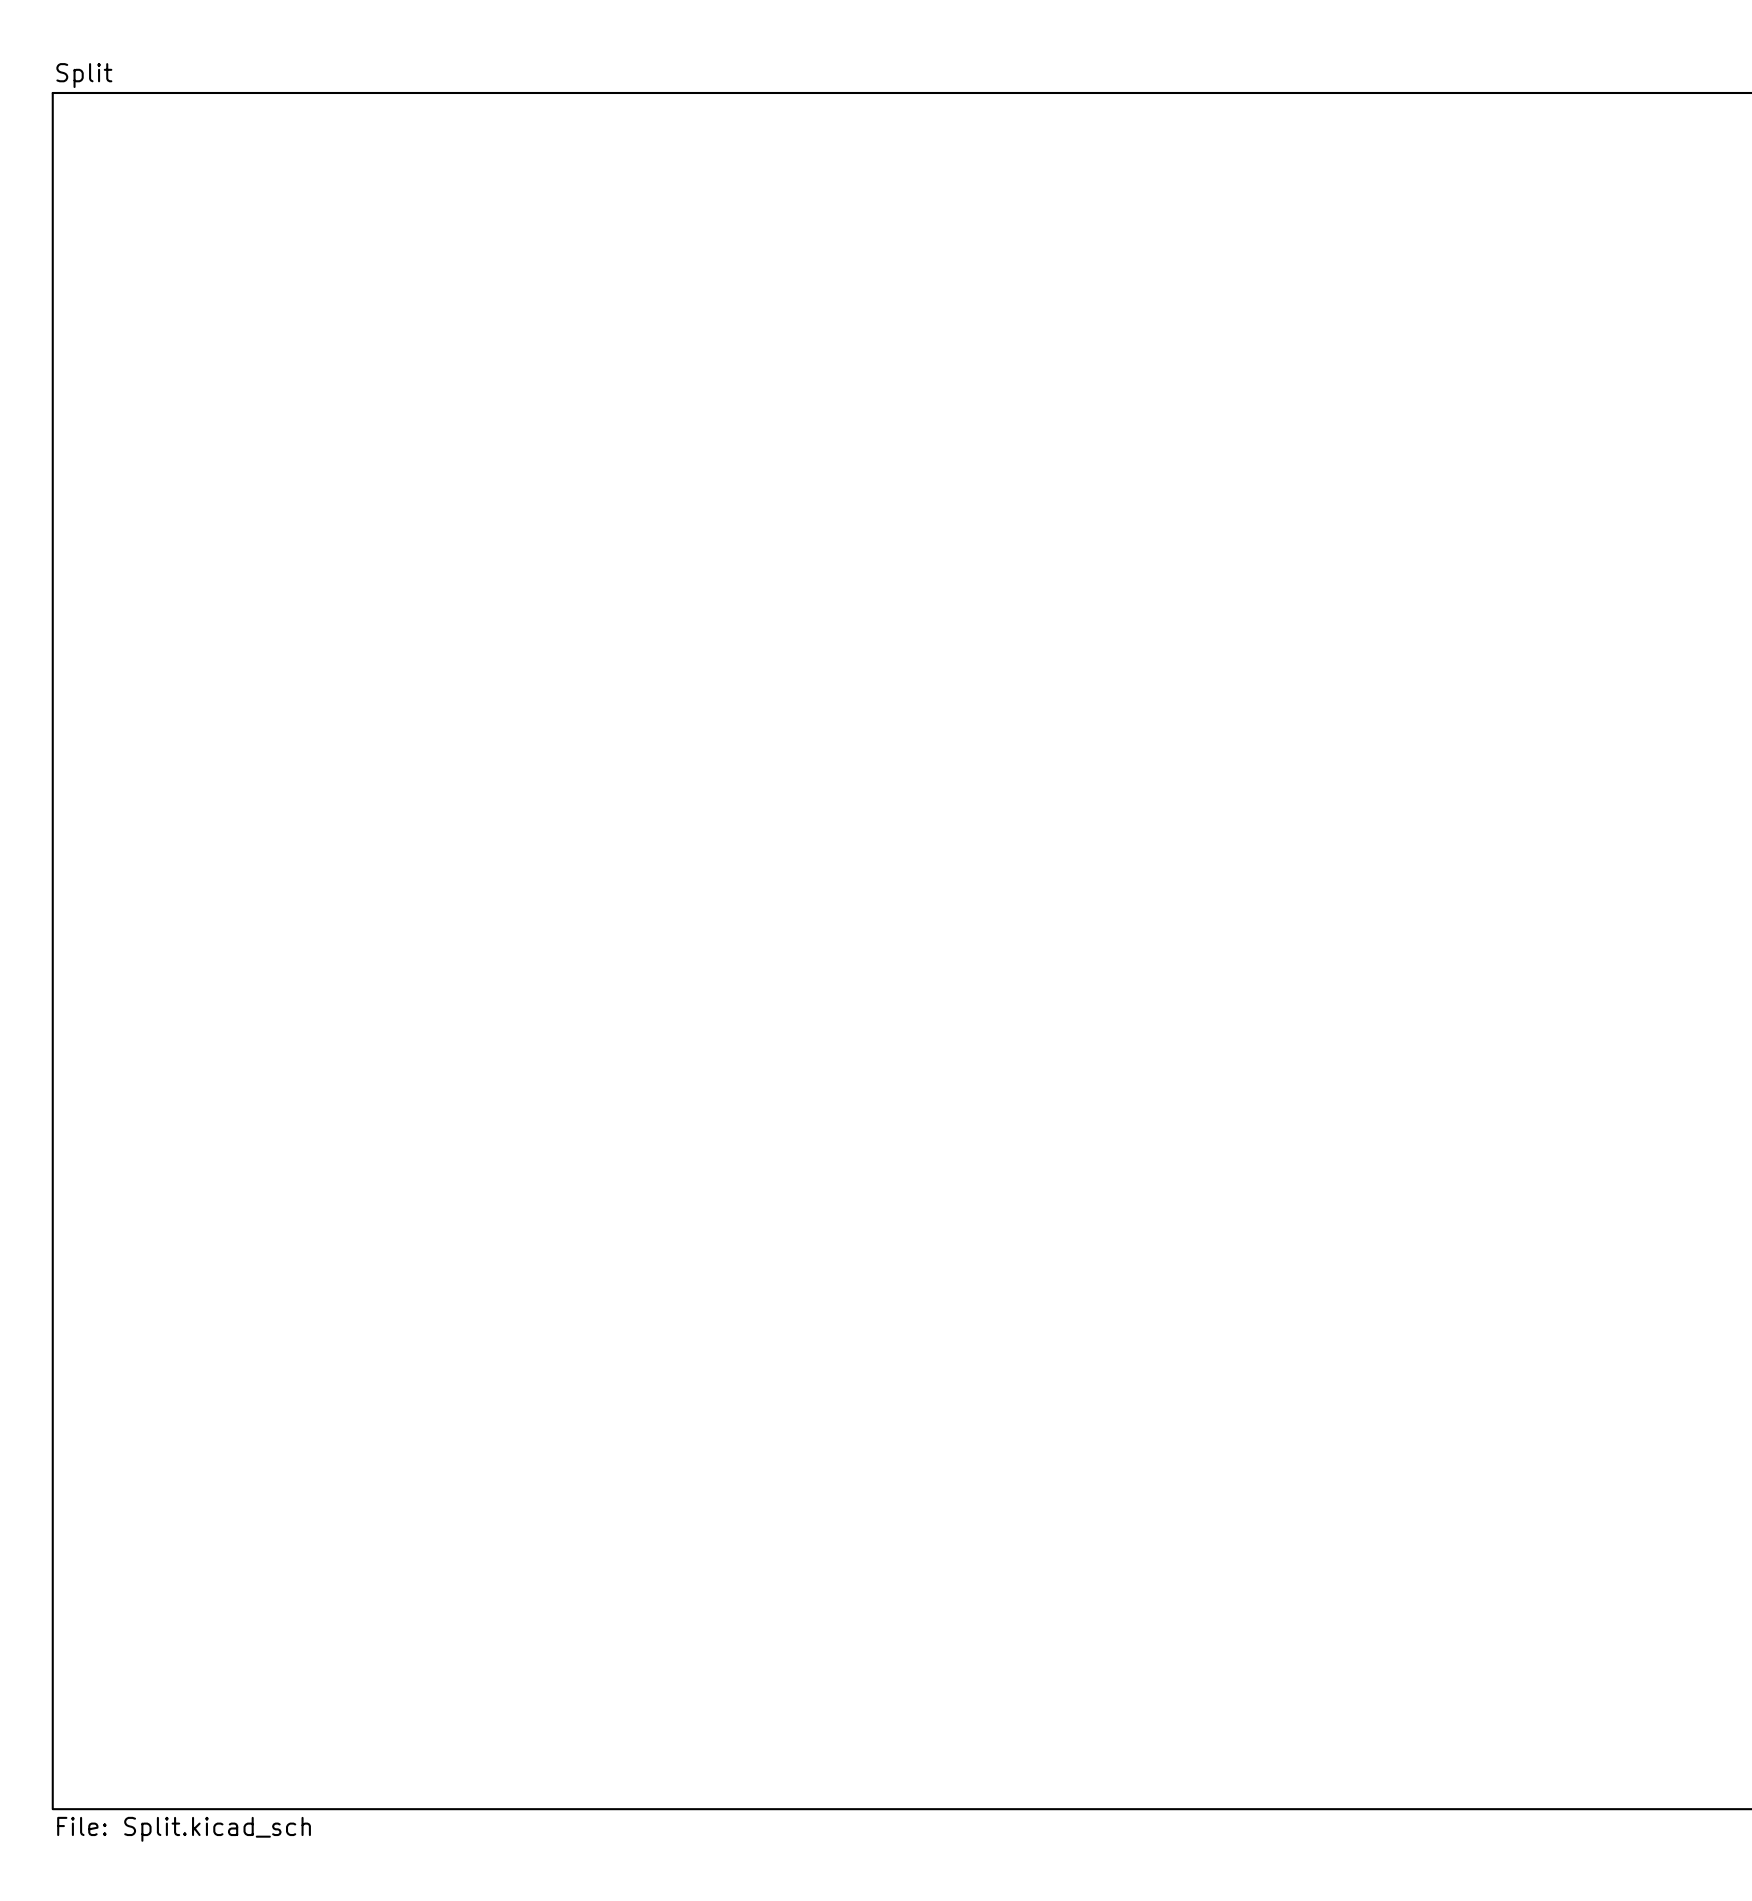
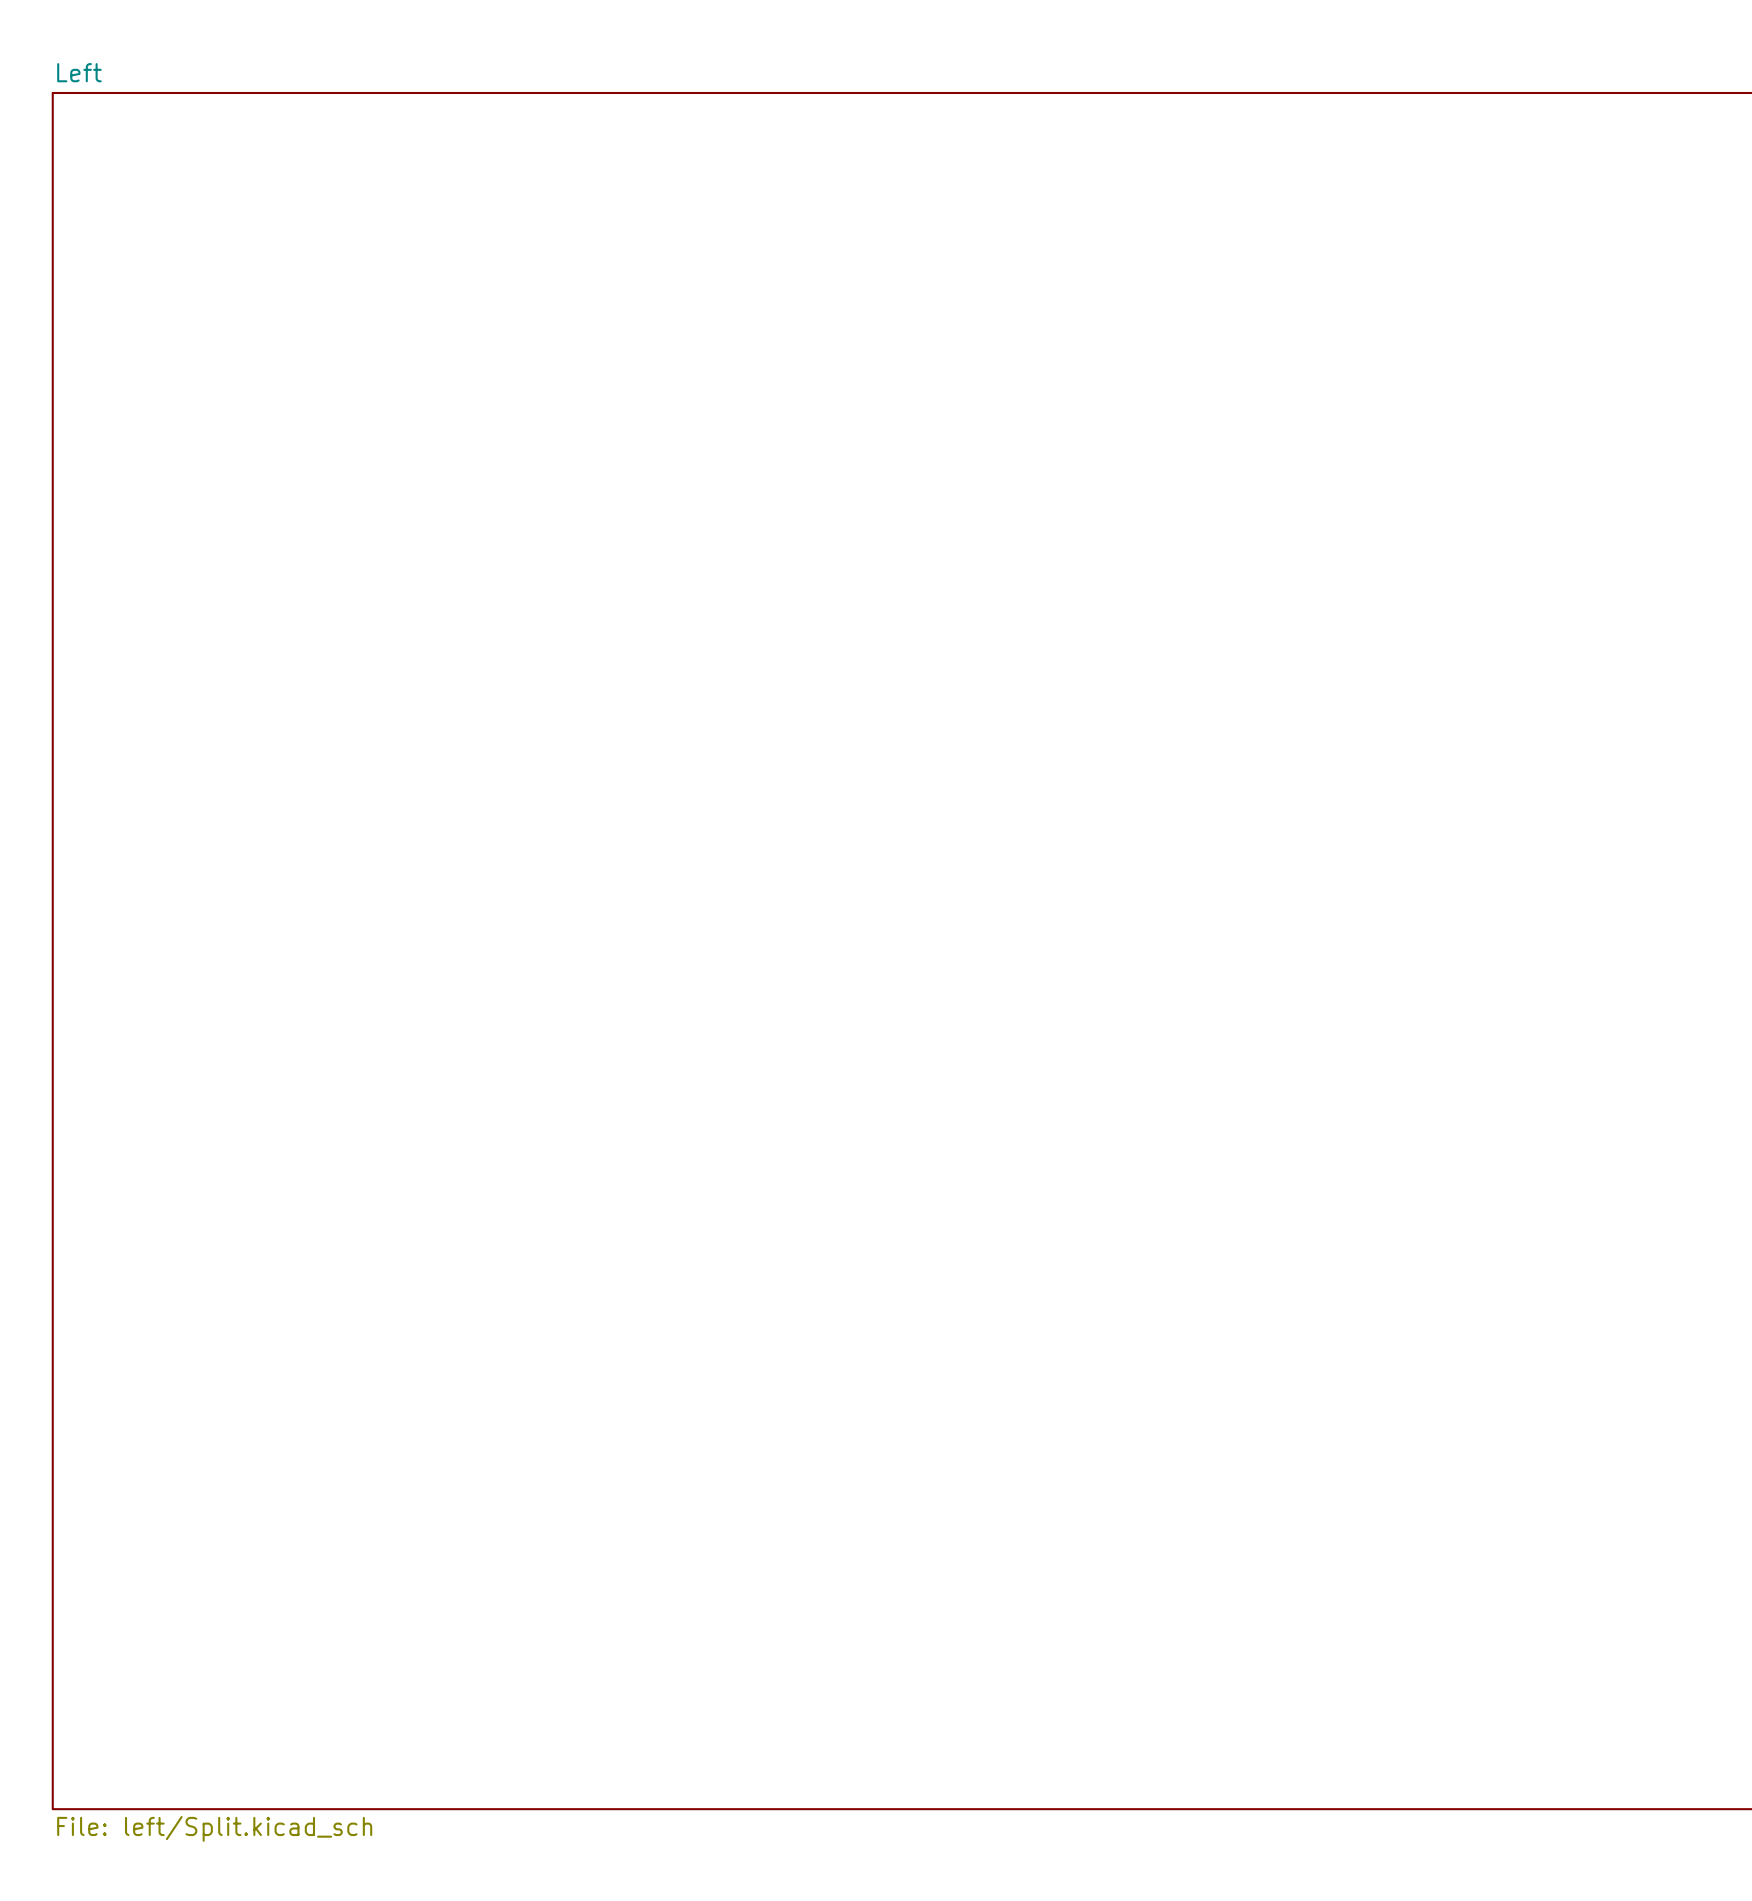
sheet Split name: Split (84, 75) -> Left (79, 72)
sheet Split value: File: Split.kicad_sch (184, 1829) -> File: left/Split.kicad_sch (214, 1828)

